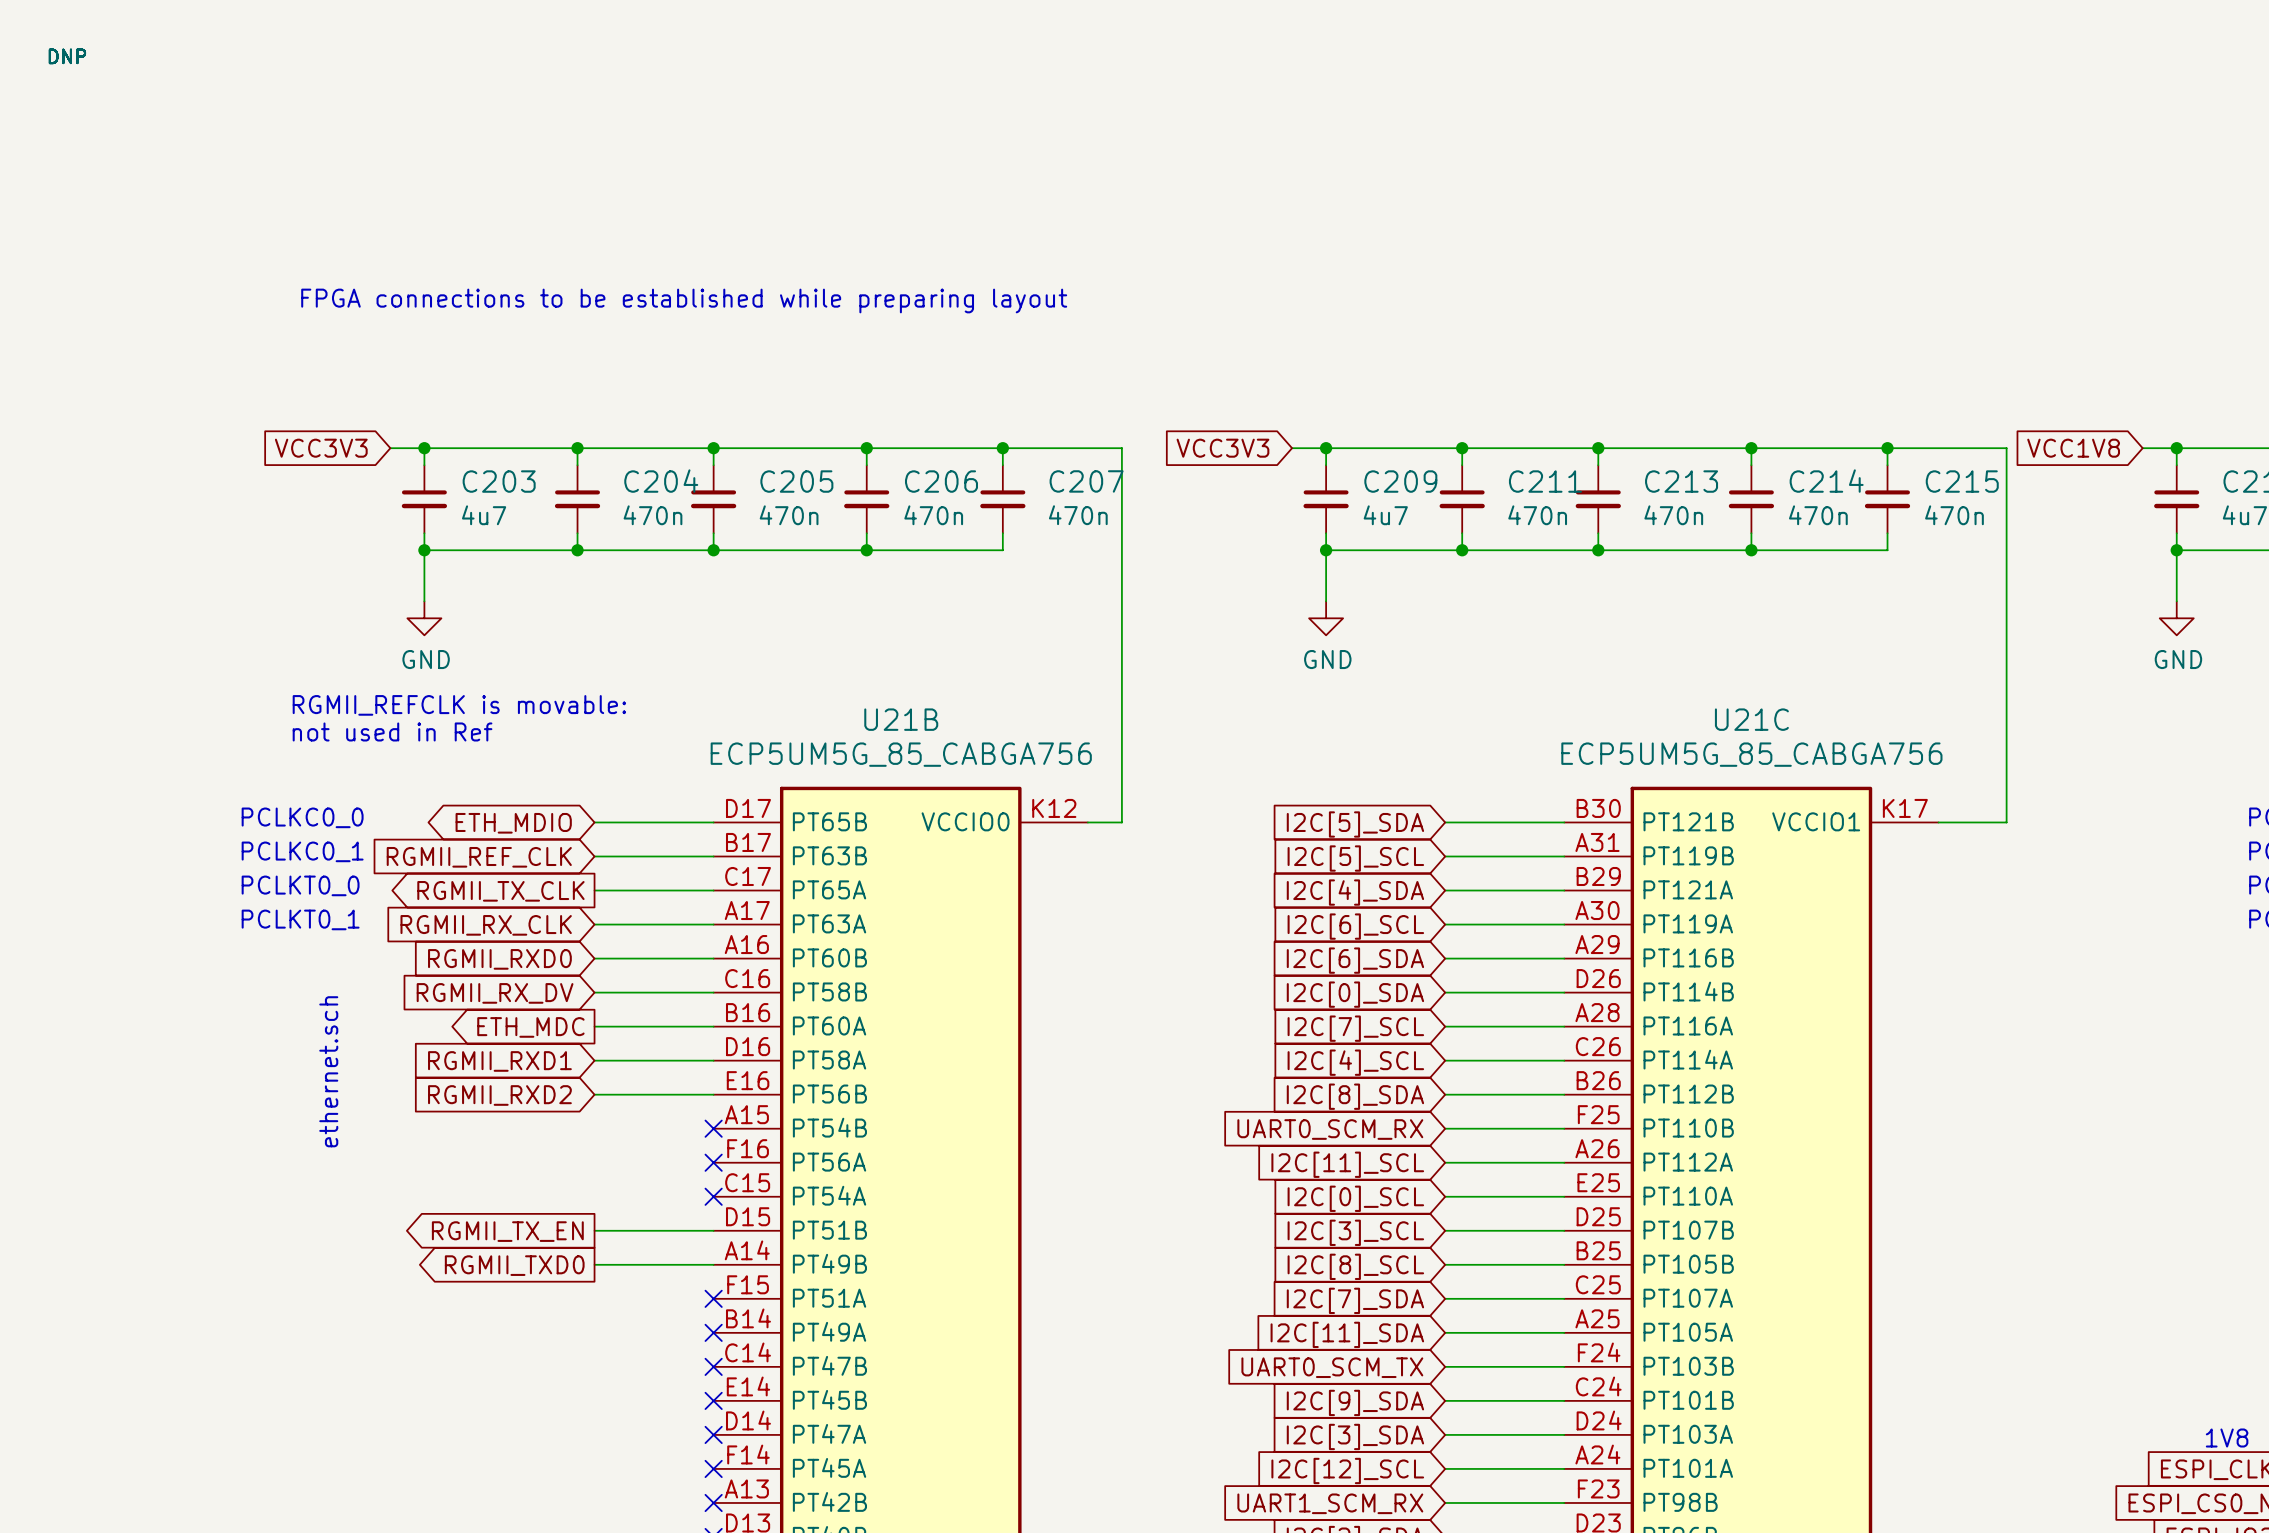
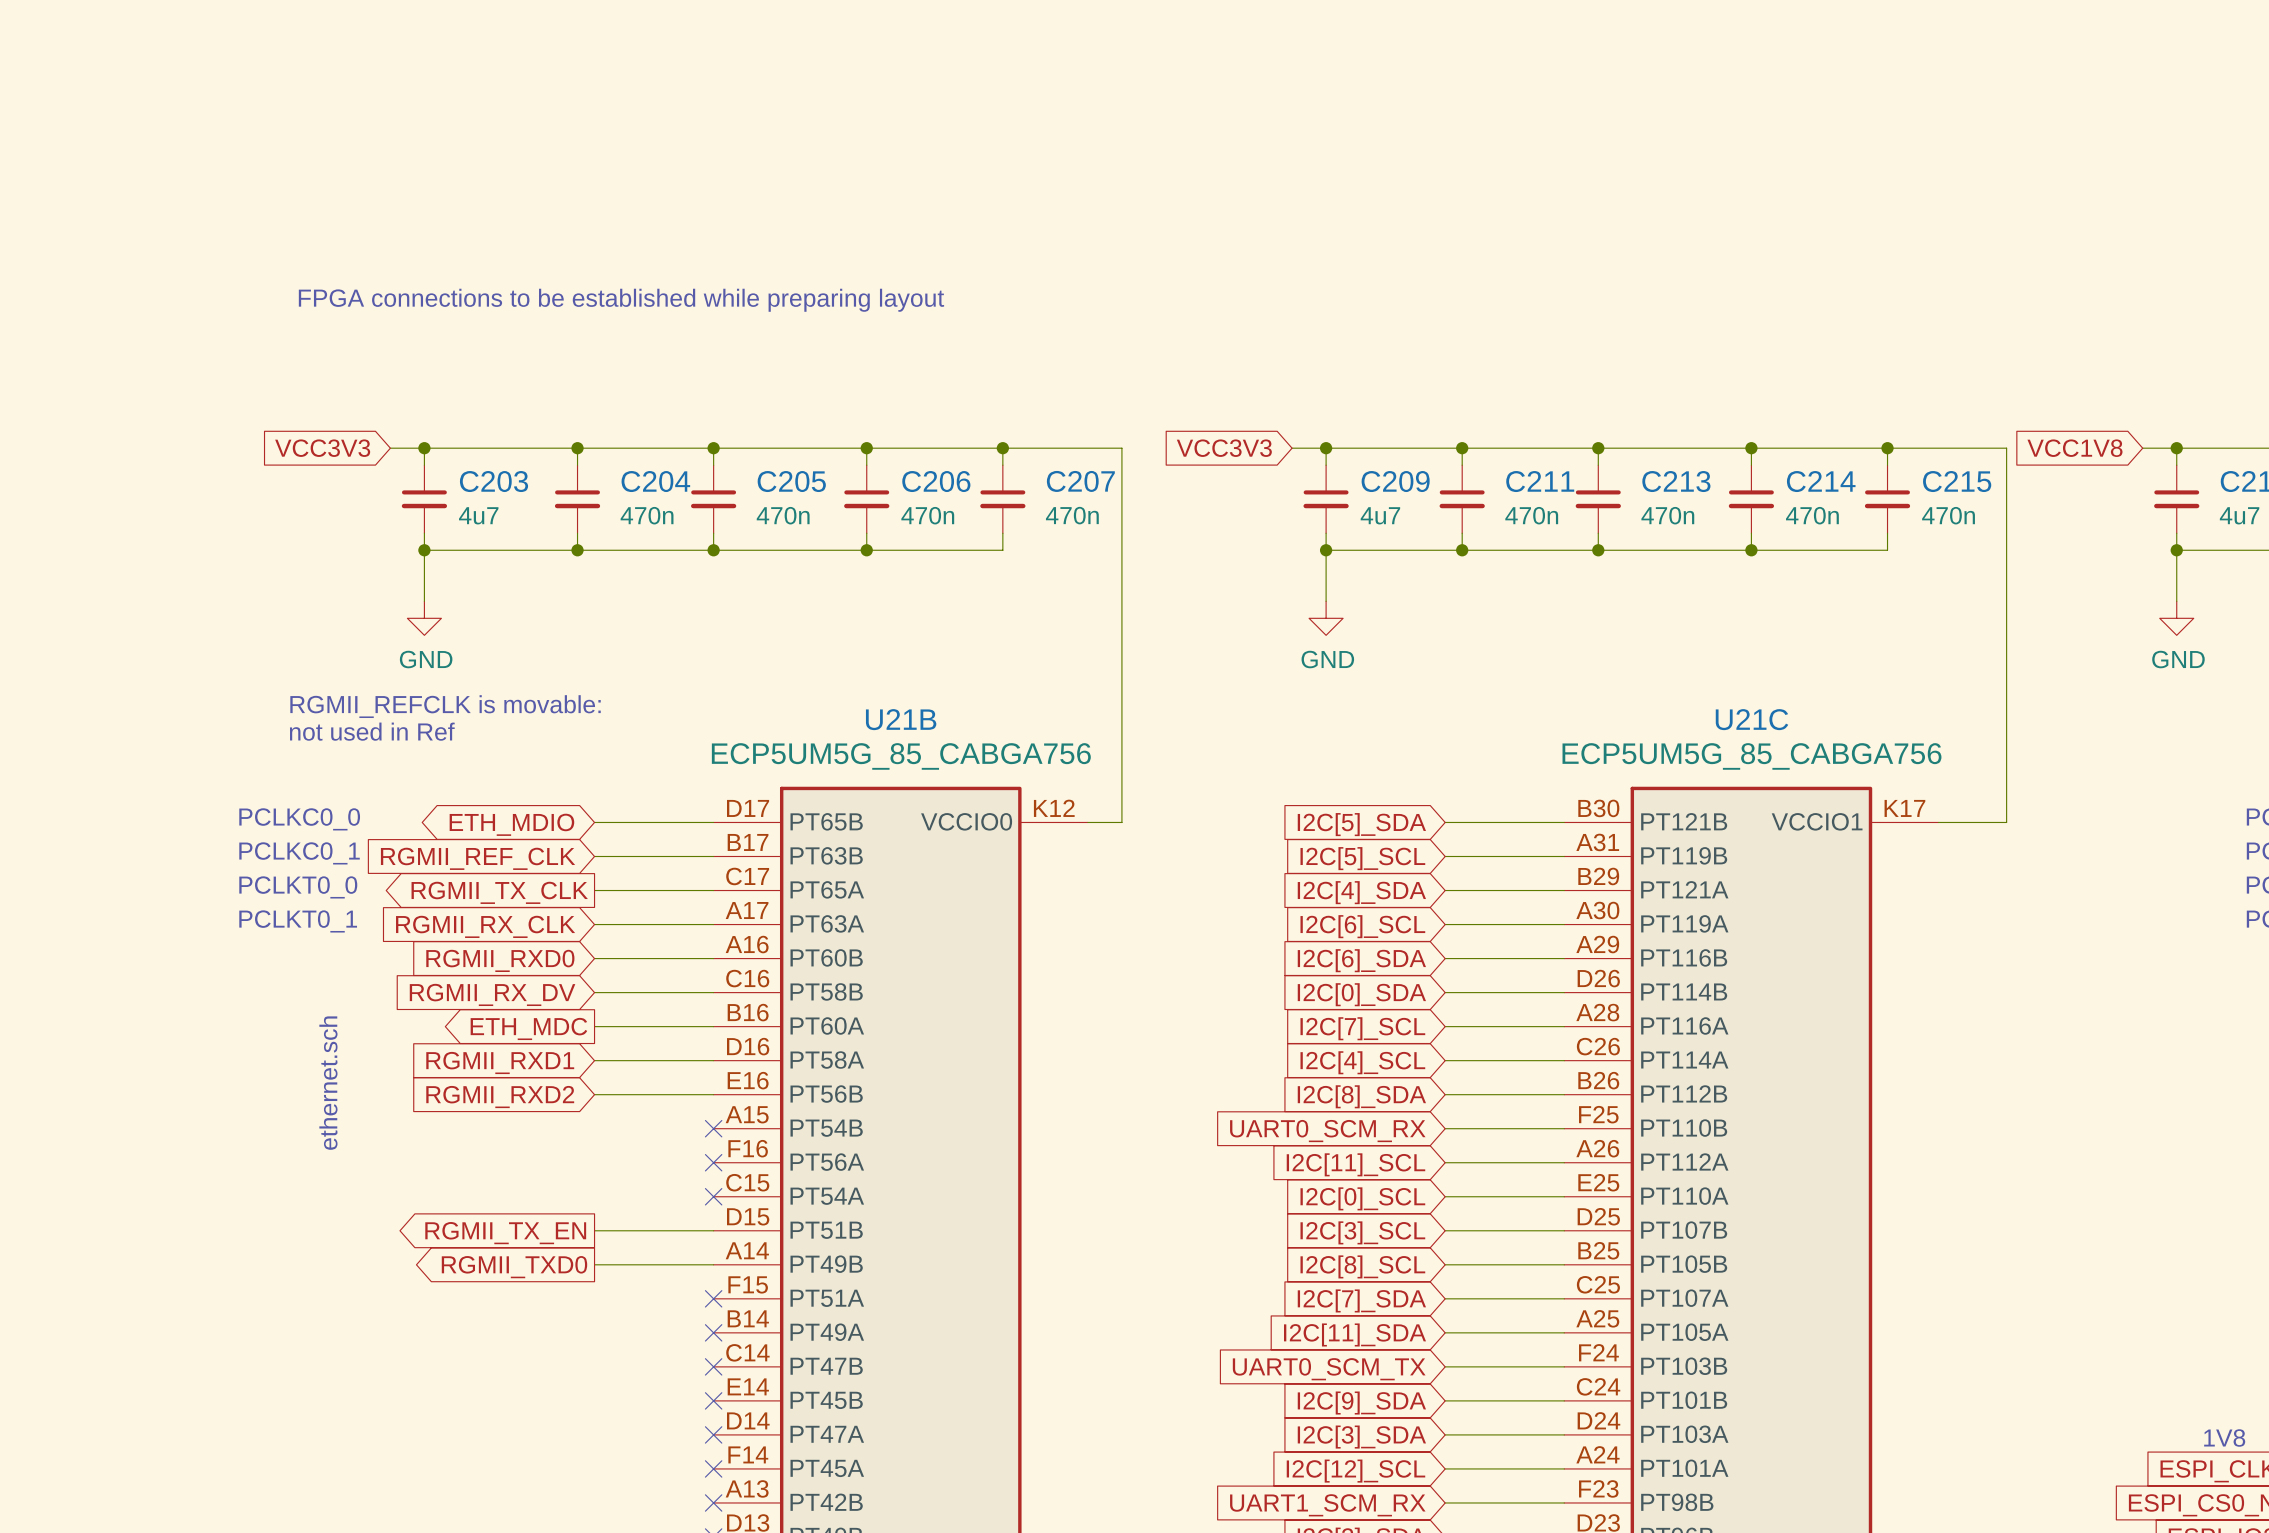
part text: DNP (67, 56) -> none
part text: DNP (67, 56) -> none
part text: DNP (67, 56) -> none
part text: DNP (67, 56) -> none

